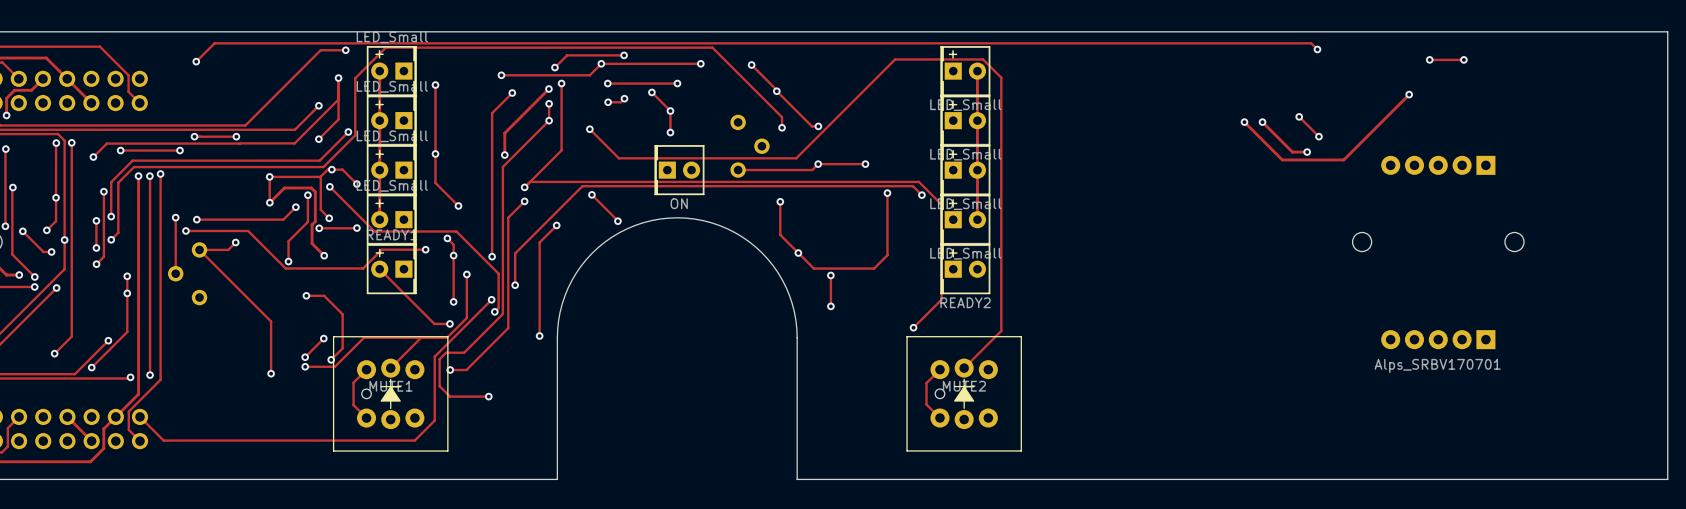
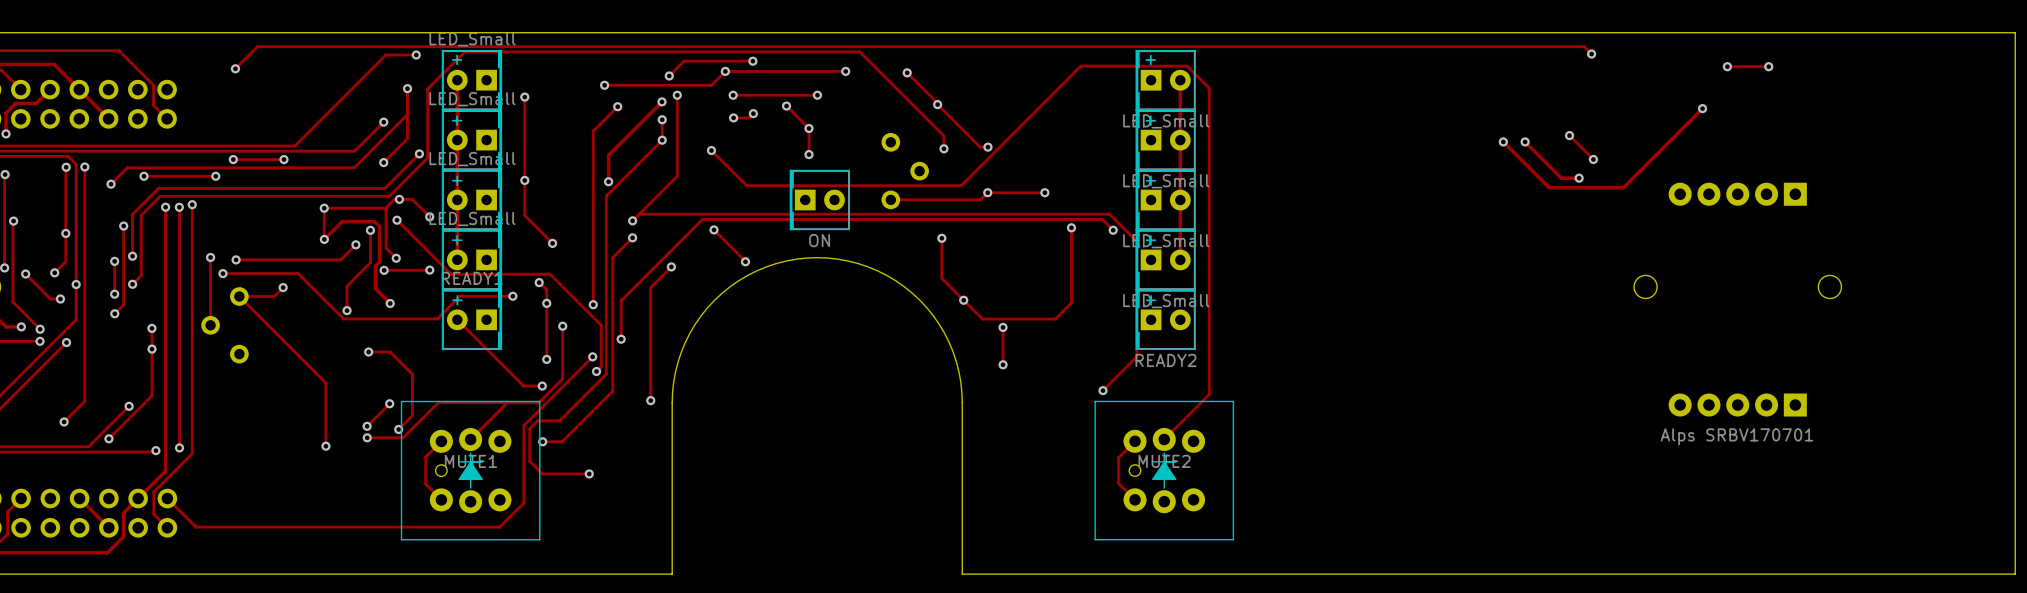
part value: Alps_SRBV170701 (1437, 365) -> Alps SRBV170701 (1736, 436)

